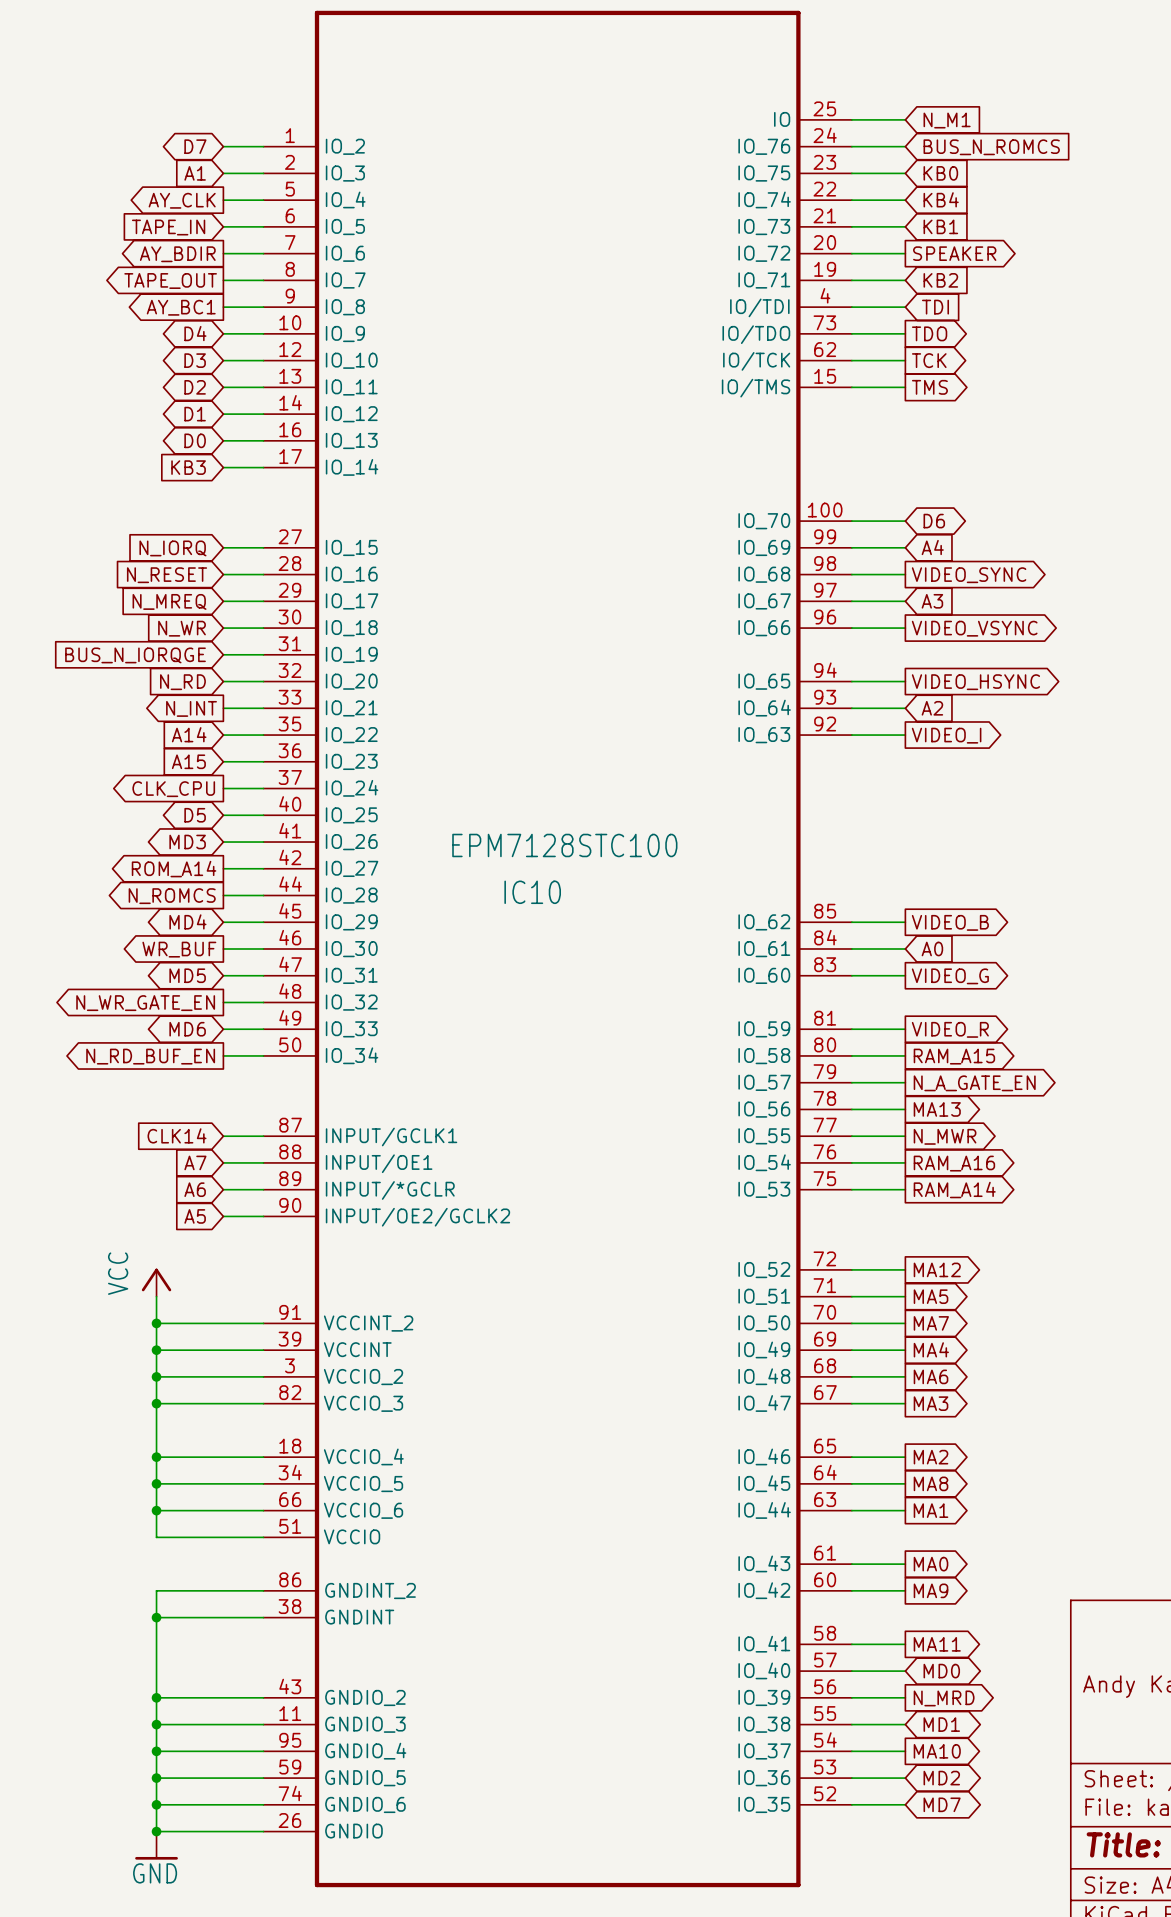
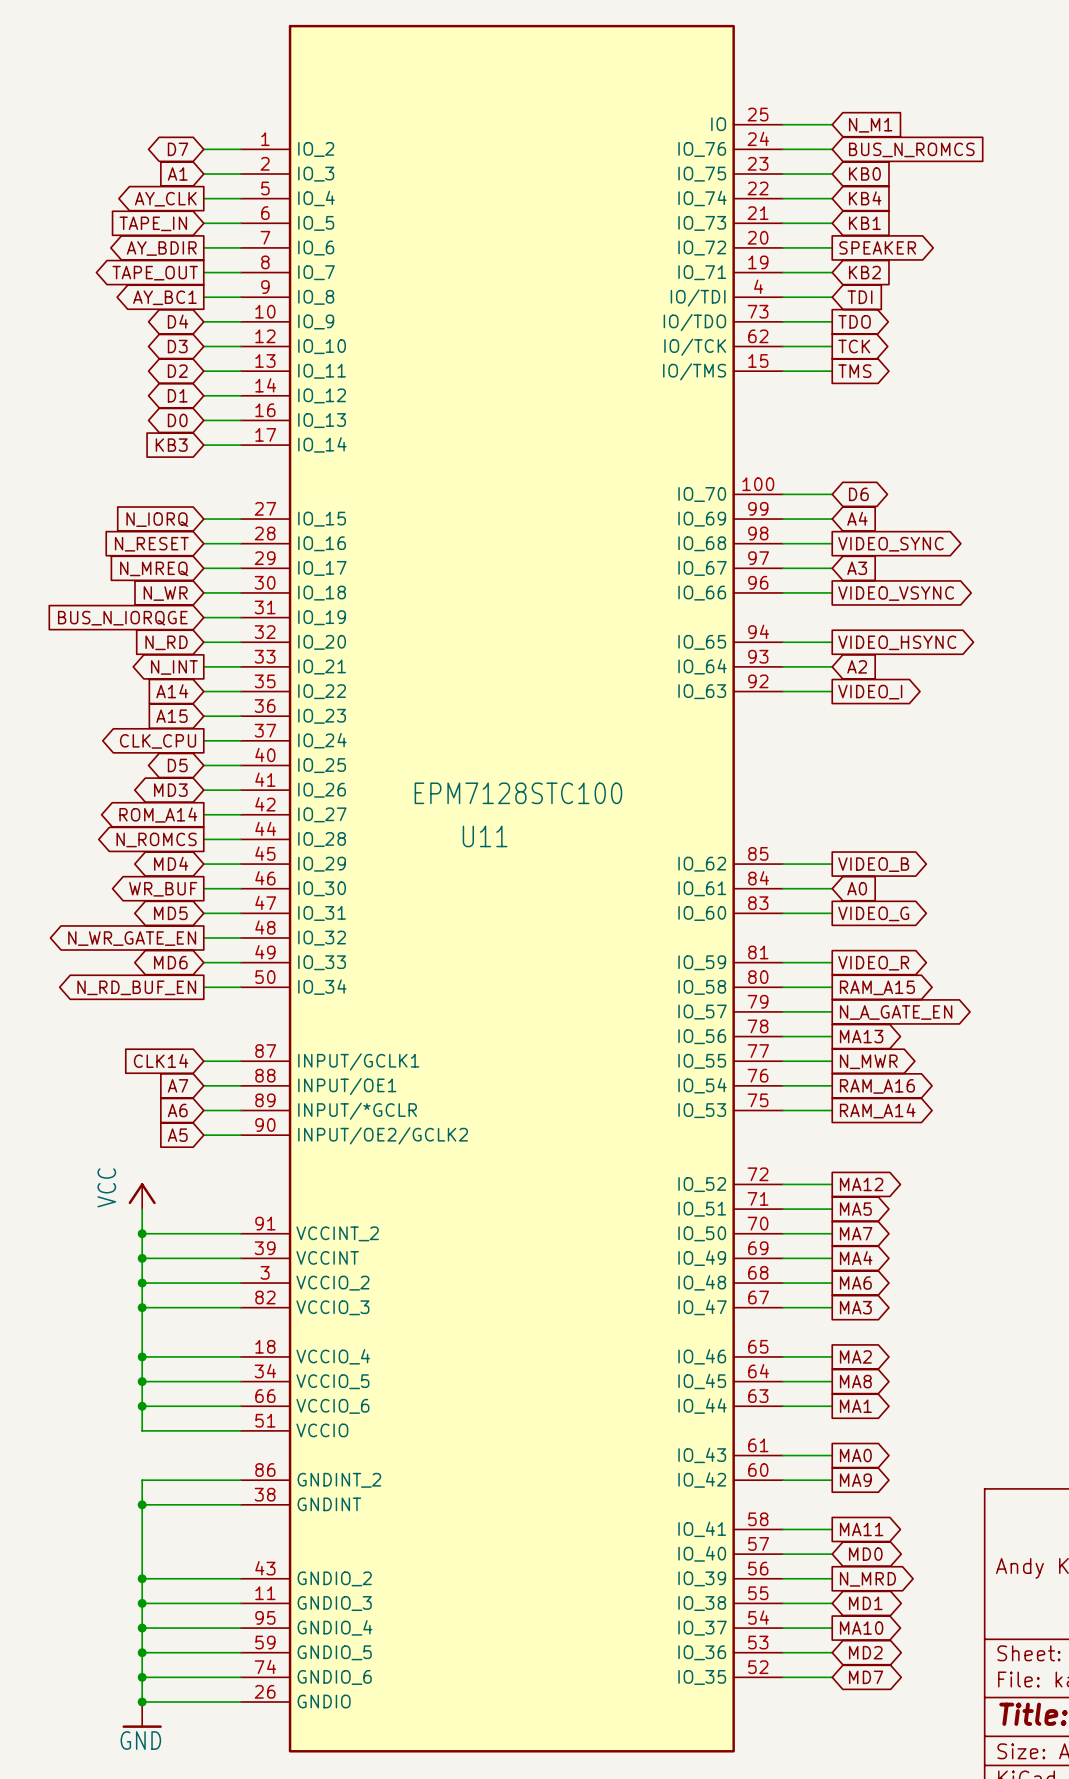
IC10: EPM7128STC100 (557, 948) -> none
U11: none -> EPM7128STC100 (511, 888)

